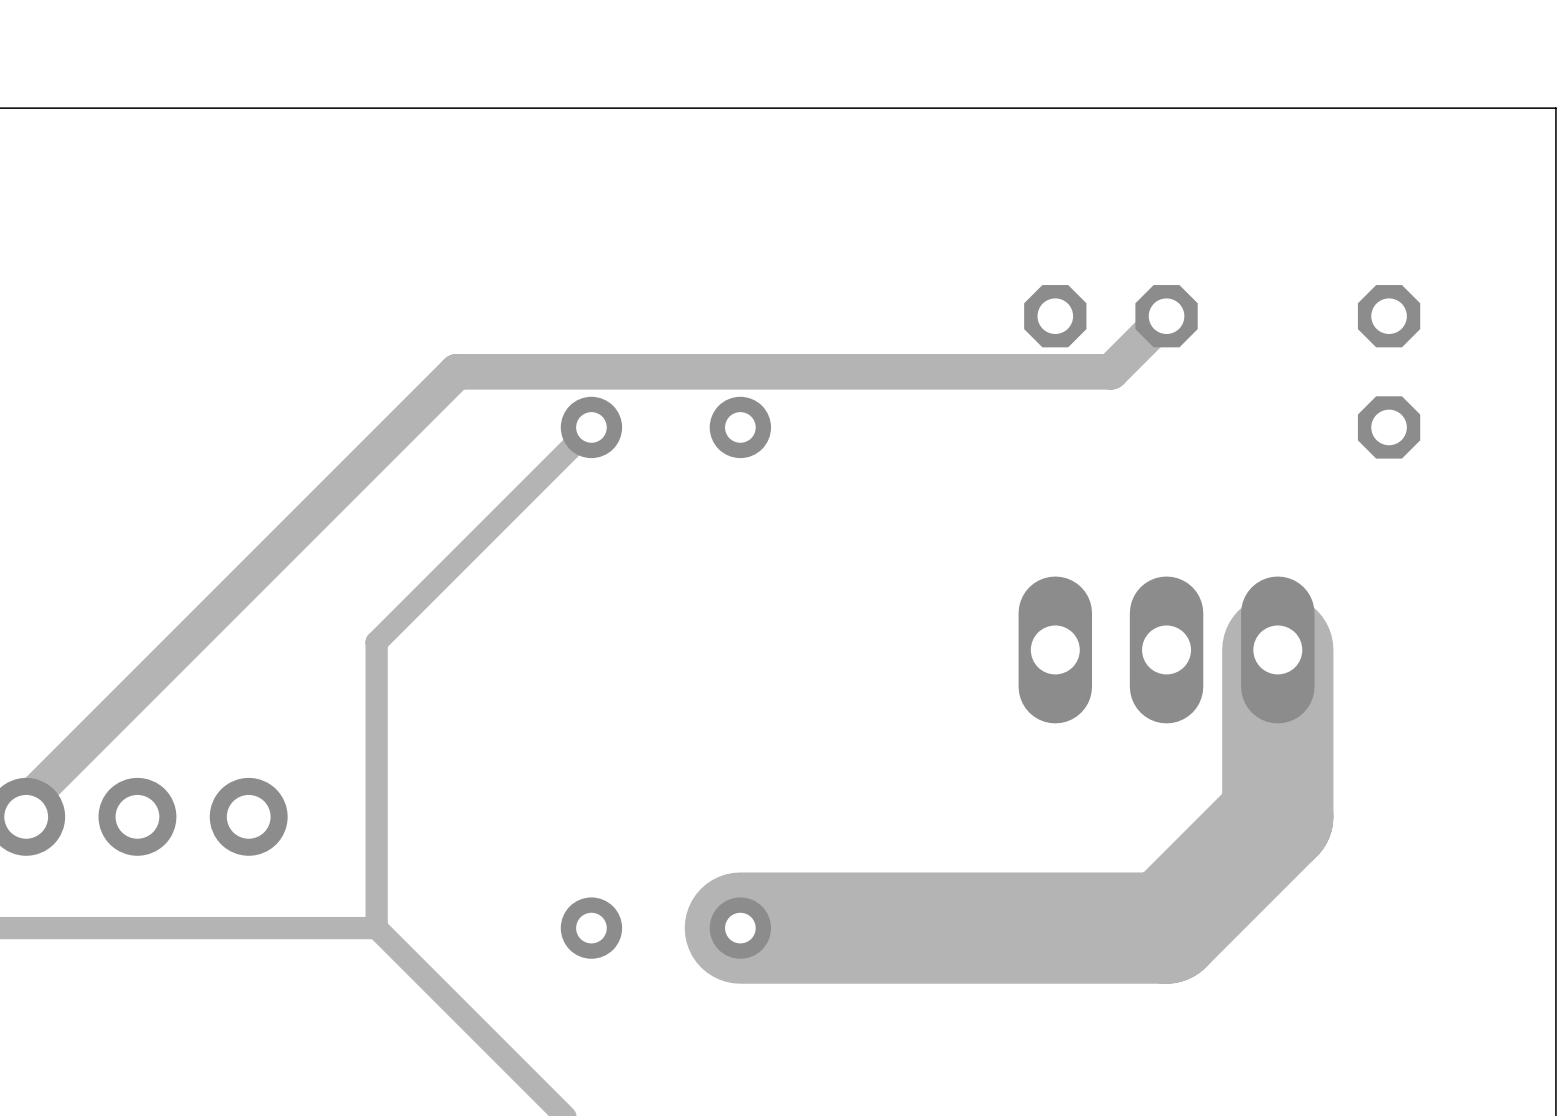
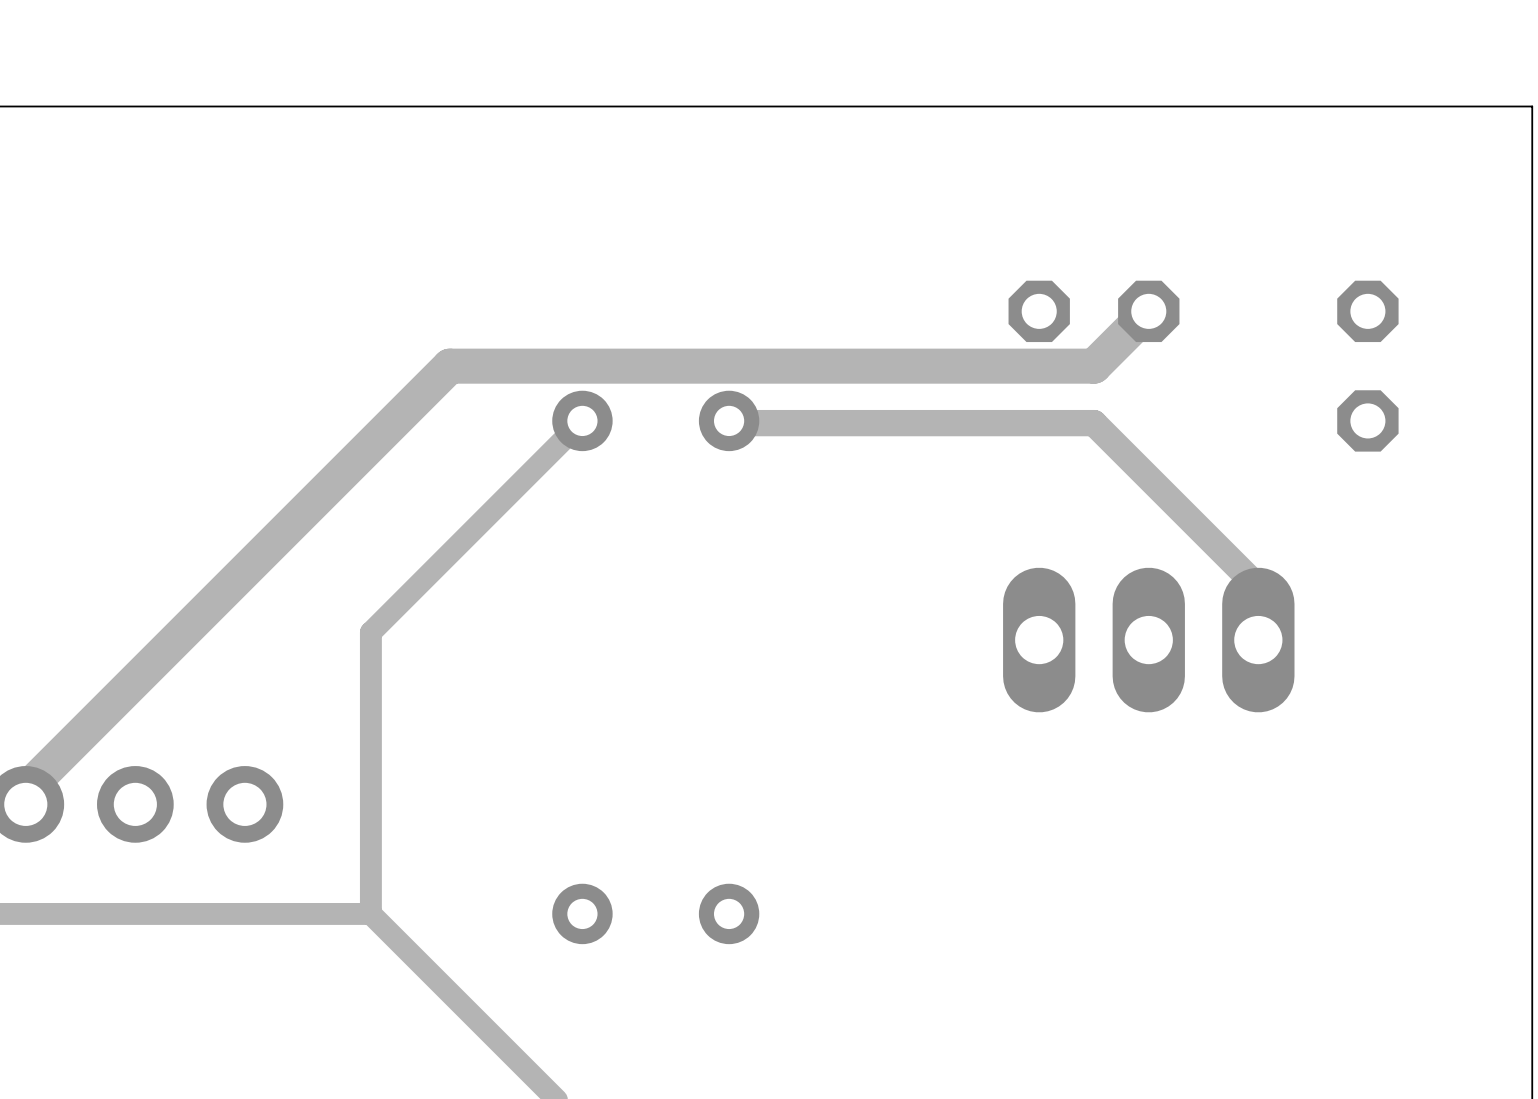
track: (1277, 649) (1277, 816) (1166, 928) (740, 928) -> (1258, 640) (1258, 587) (1094, 423) (730, 423) (729, 420)

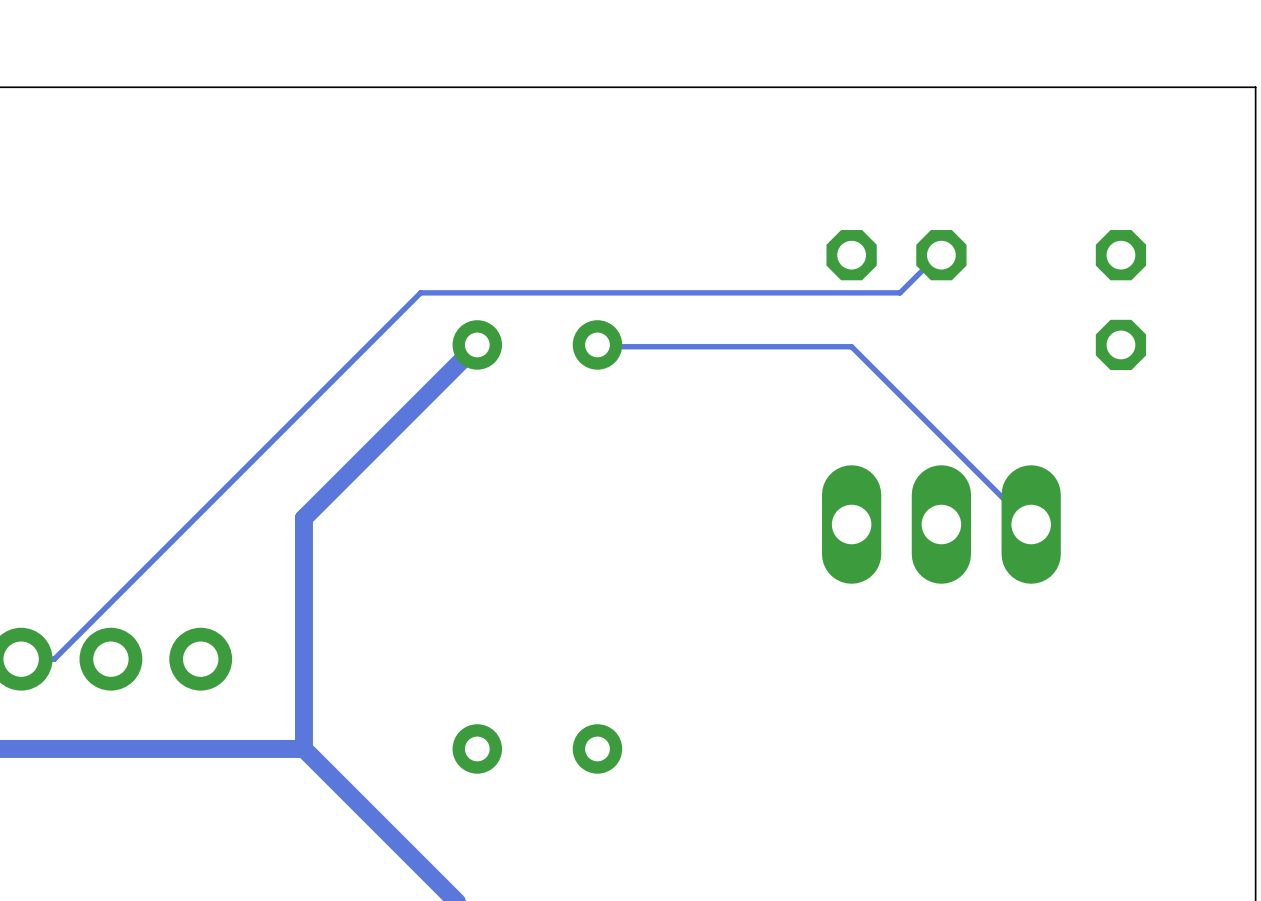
track: (1148, 311) (1094, 366) (449, 366) (25, 790) (25, 804) -> (941, 255) (937, 255) (900, 292) (420, 292) (54, 659) (21, 659)
track: (1039, 423) (1094, 423) (1258, 587) (1258, 640) -> (851, 346) (1031, 524)
track width: thick (1039, 423) (730, 423) -> thin (851, 346) (598, 346)

